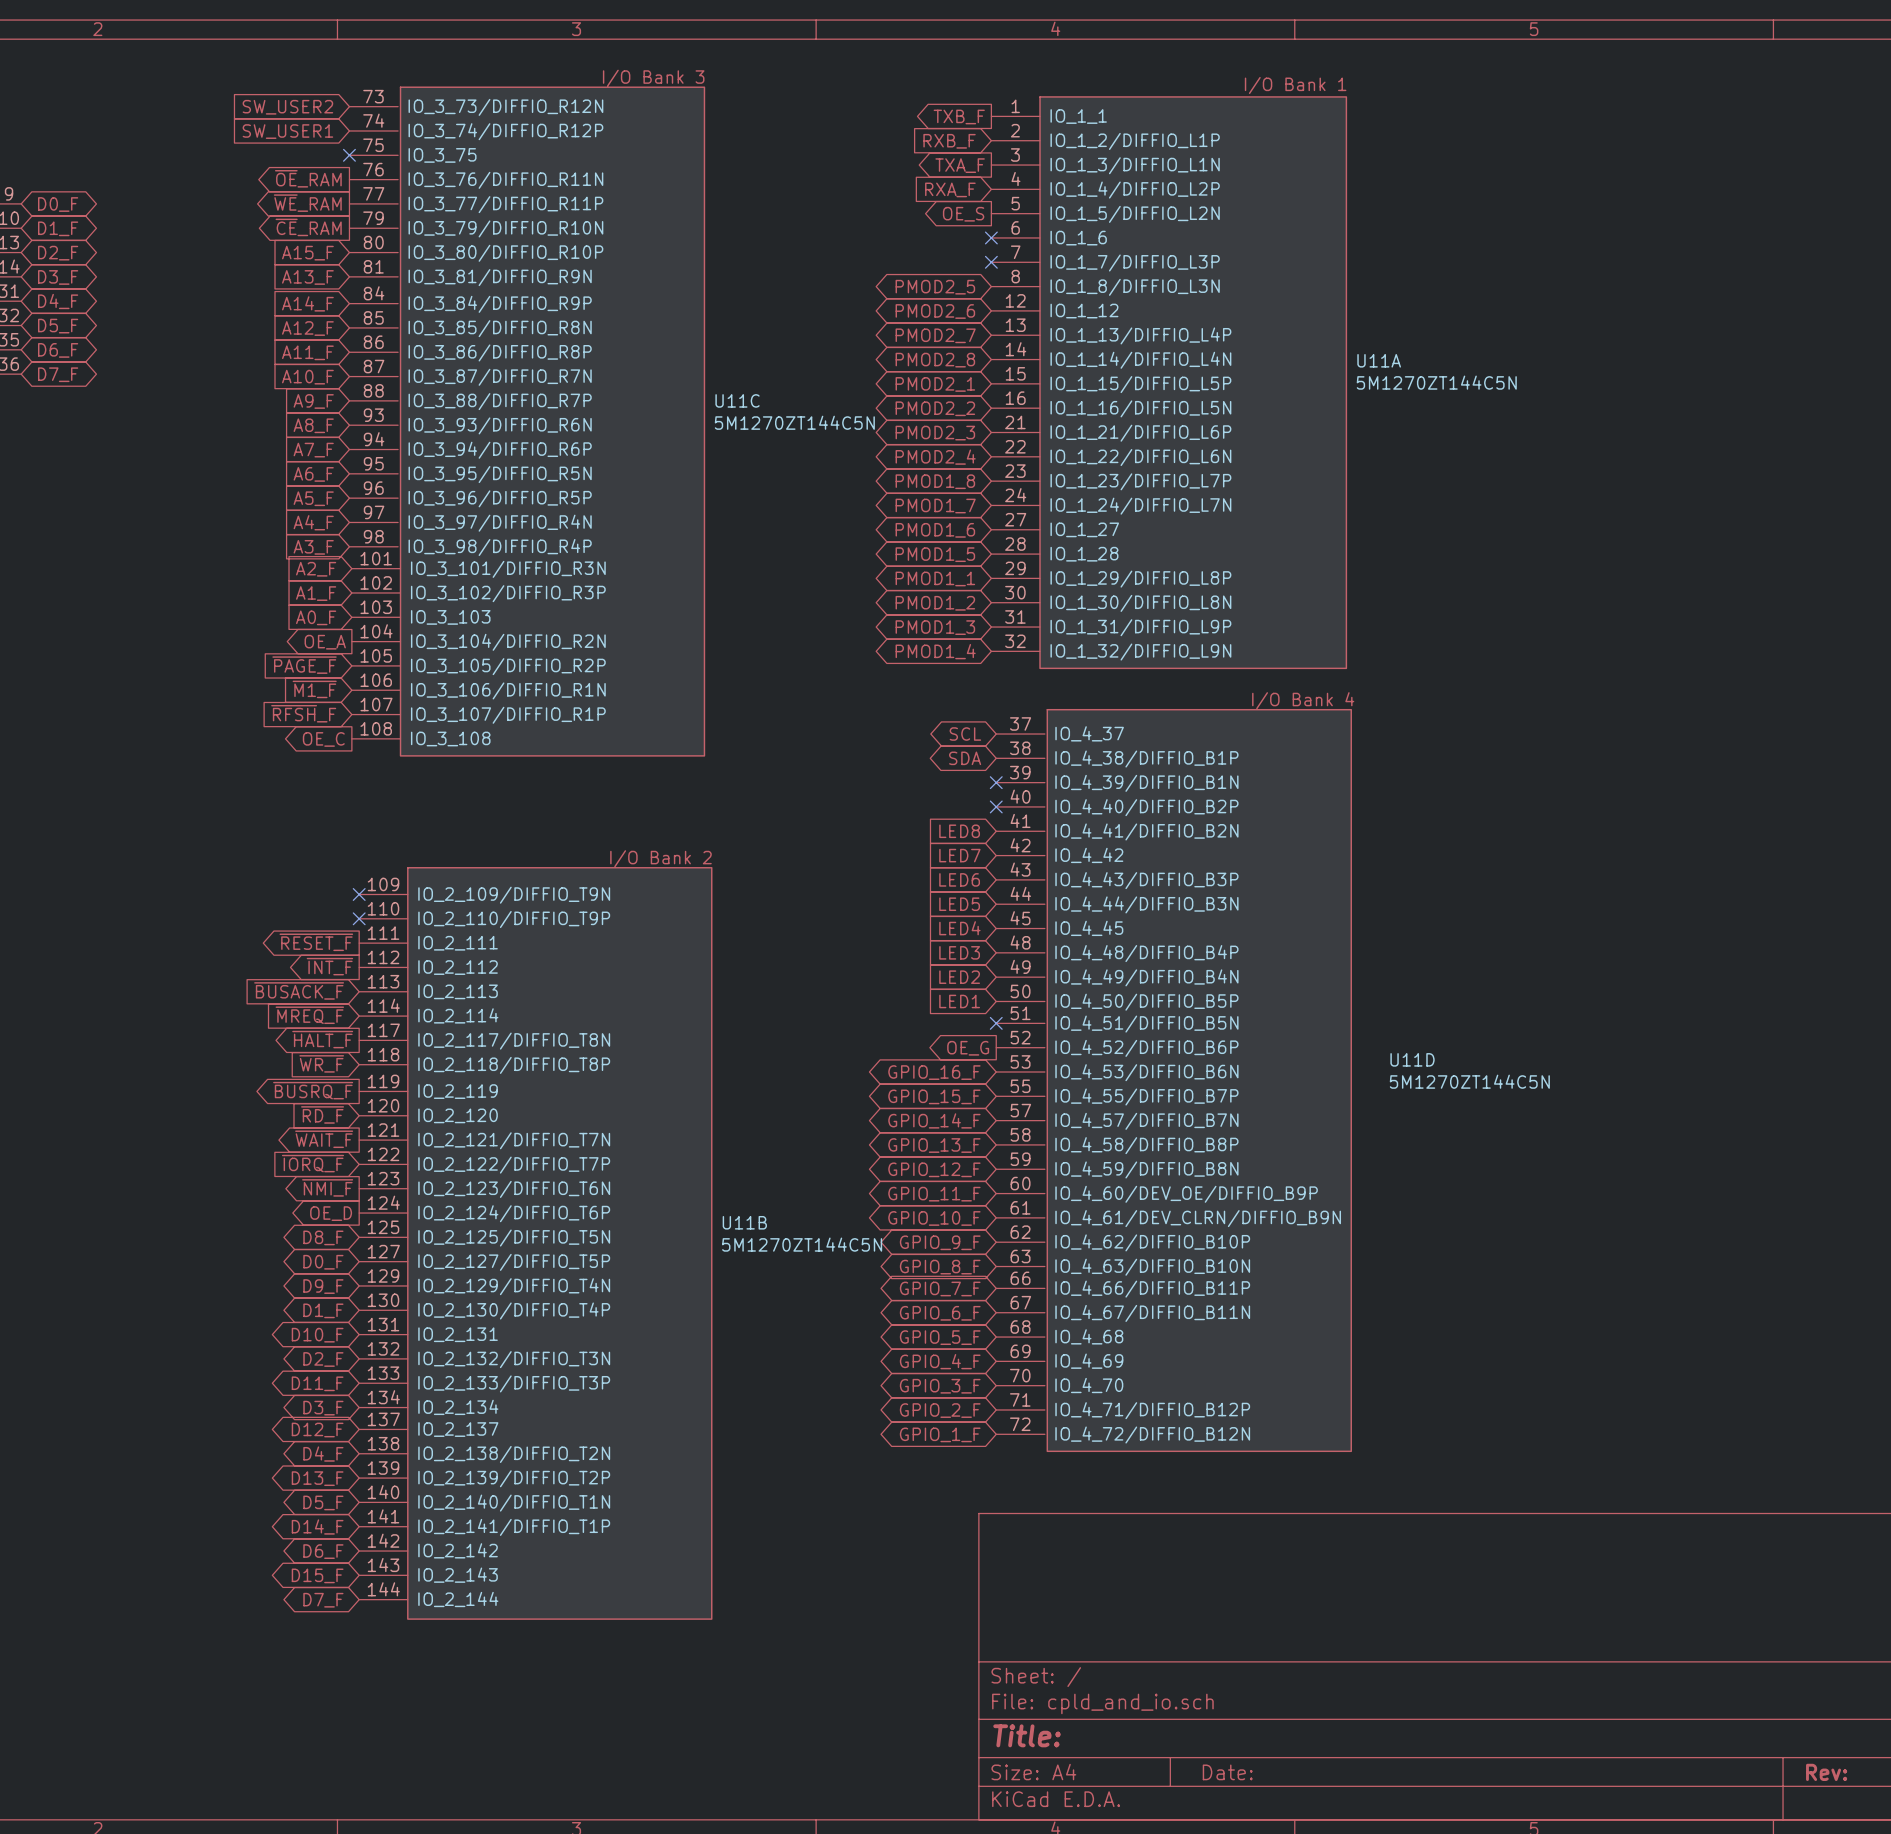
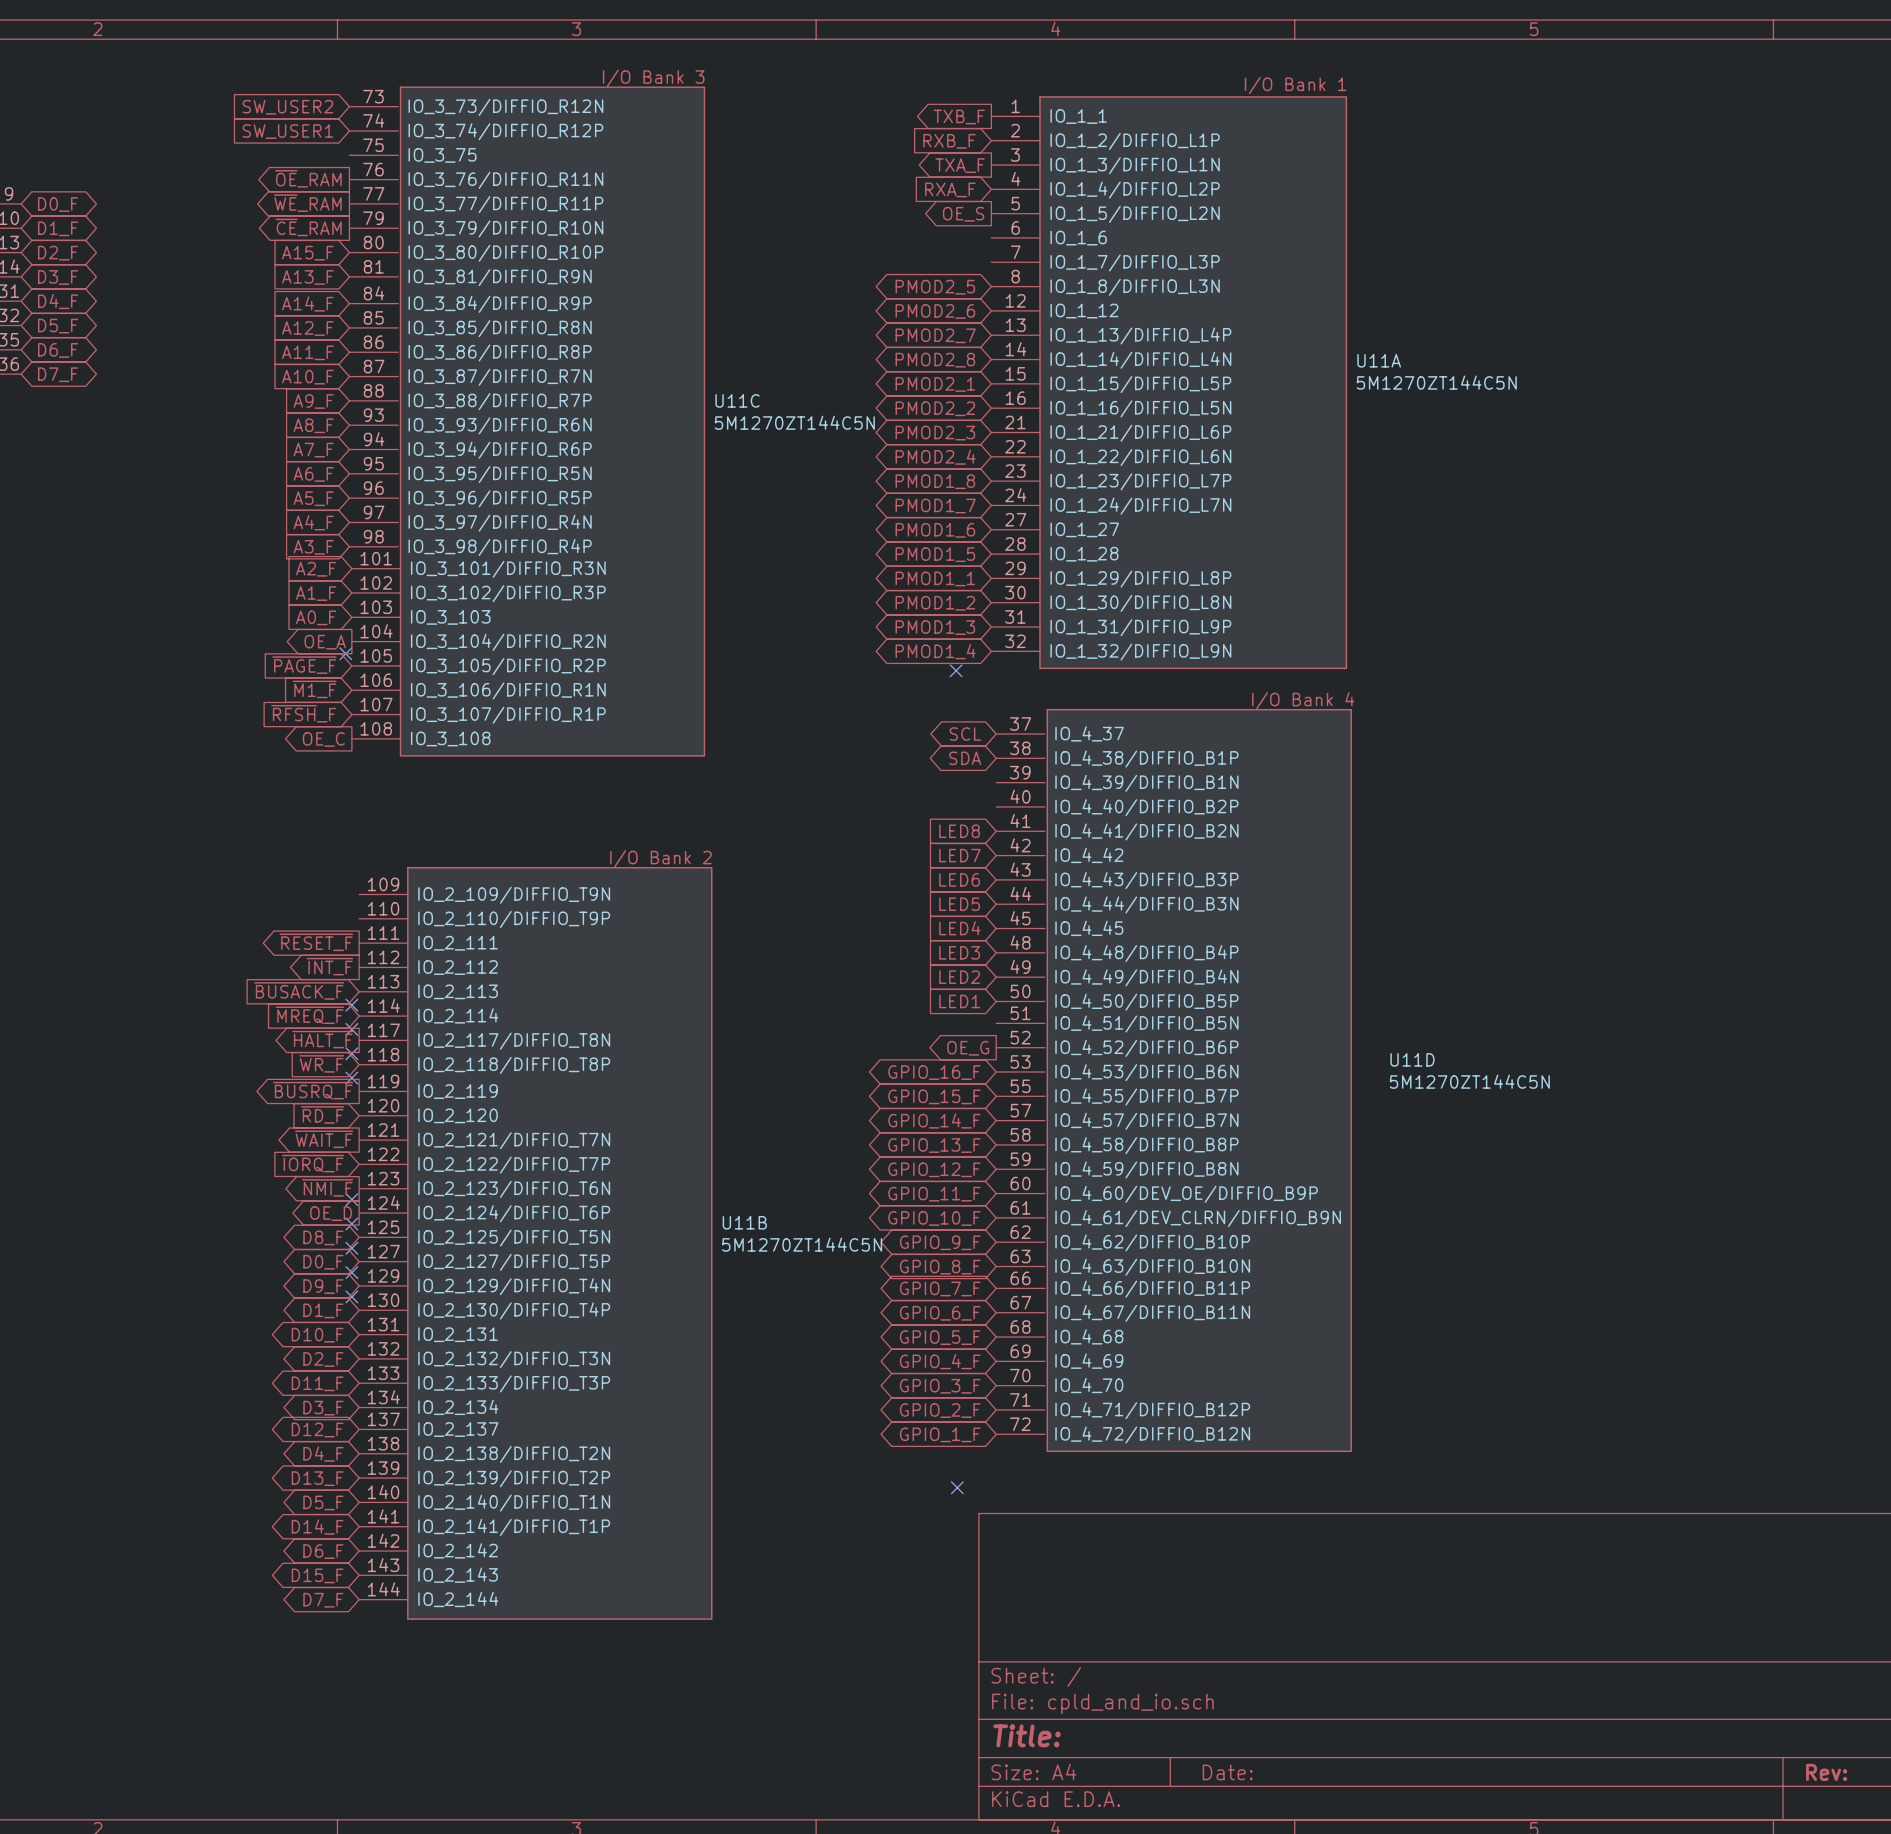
no-connect mark: (349, 155) -> none
no-connect mark: (991, 237) -> none
no-connect mark: (991, 262) -> none
no-connect mark: none -> (345, 653)
no-connect mark: none -> (956, 670)
no-connect mark: (996, 782) -> none
no-connect mark: (996, 806) -> none
no-connect mark: (359, 894) -> none
no-connect mark: (359, 918) -> none
no-connect mark: none -> (351, 1005)
no-connect mark: (996, 1023) -> none
no-connect mark: none -> (351, 1029)
no-connect mark: none -> (351, 1053)
no-connect mark: none -> (351, 1078)
no-connect mark: none -> (351, 1199)
no-connect mark: none -> (351, 1223)
no-connect mark: none -> (351, 1248)
no-connect mark: none -> (351, 1272)
no-connect mark: none -> (351, 1296)
no-connect mark: none -> (957, 1487)

